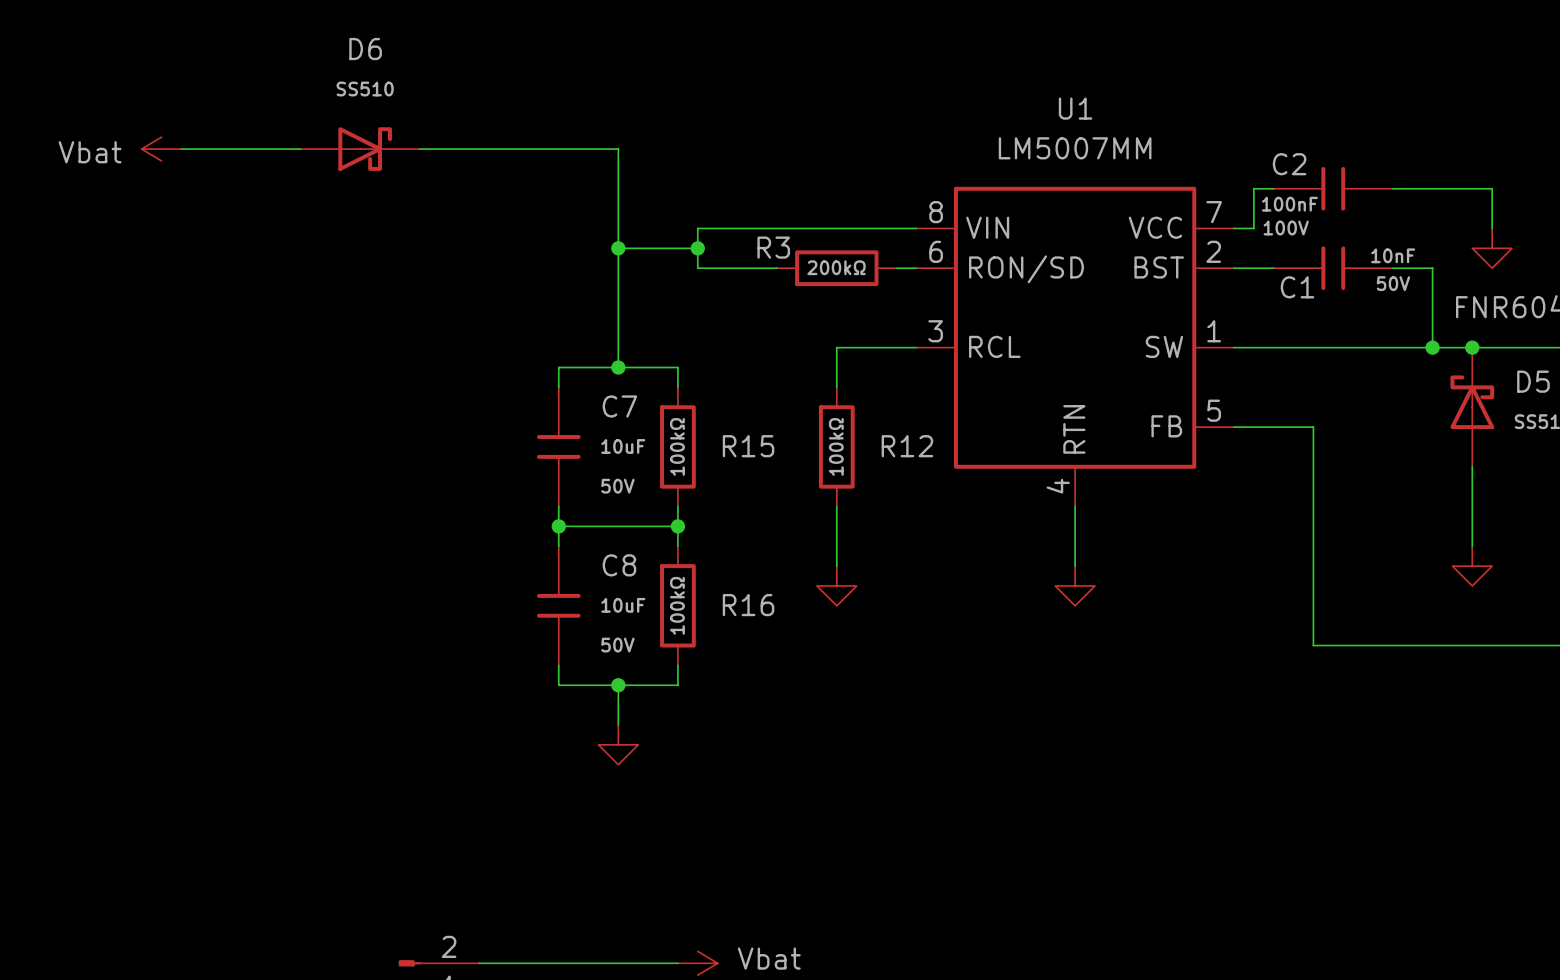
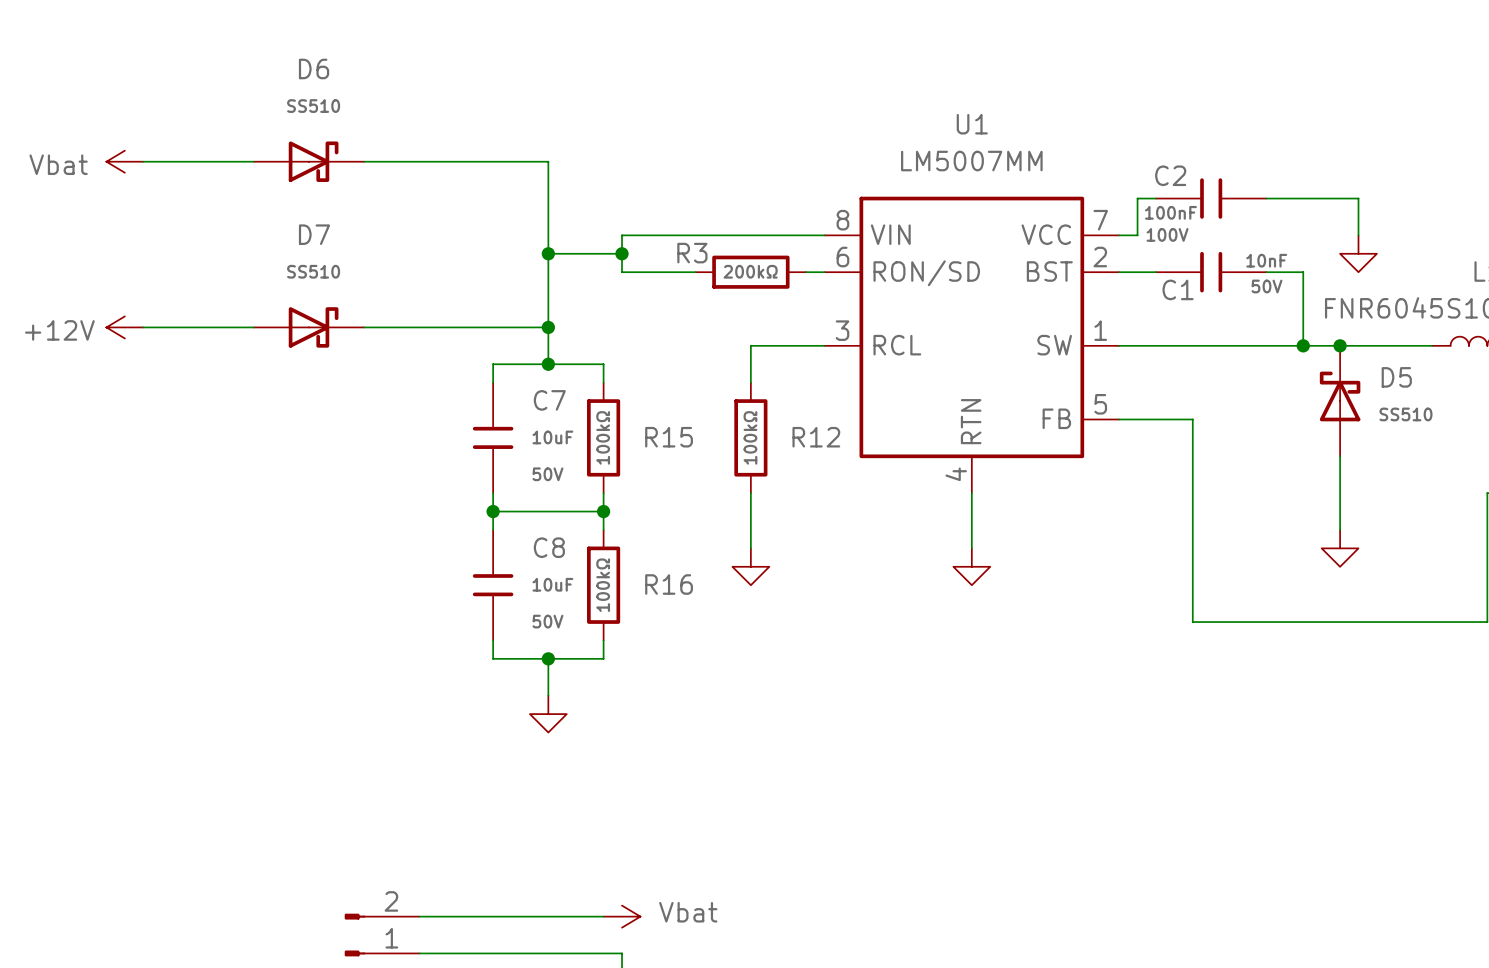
power symbol: none -> +12V (124, 327)
wire: none -> (143, 327) (253, 327)
D7: none -> SS510 (308, 327)
wire: none -> (364, 327) (548, 327)
junction: none -> (548, 327)

